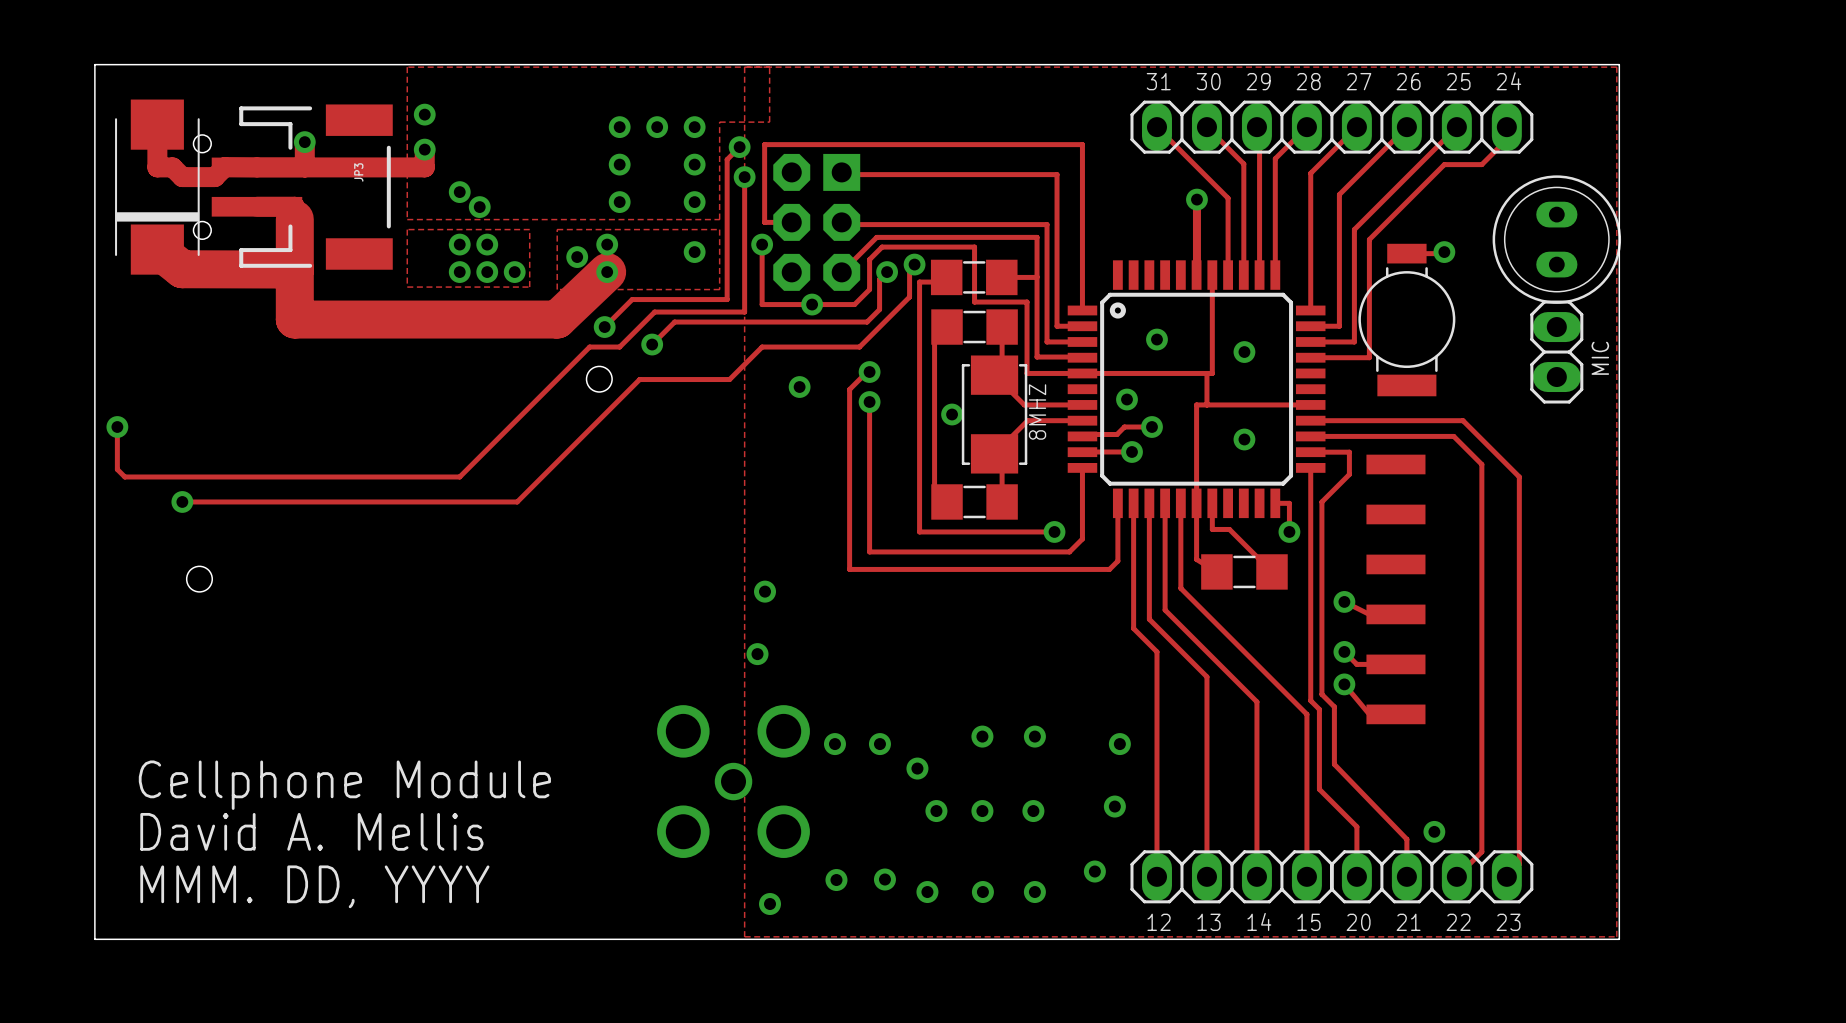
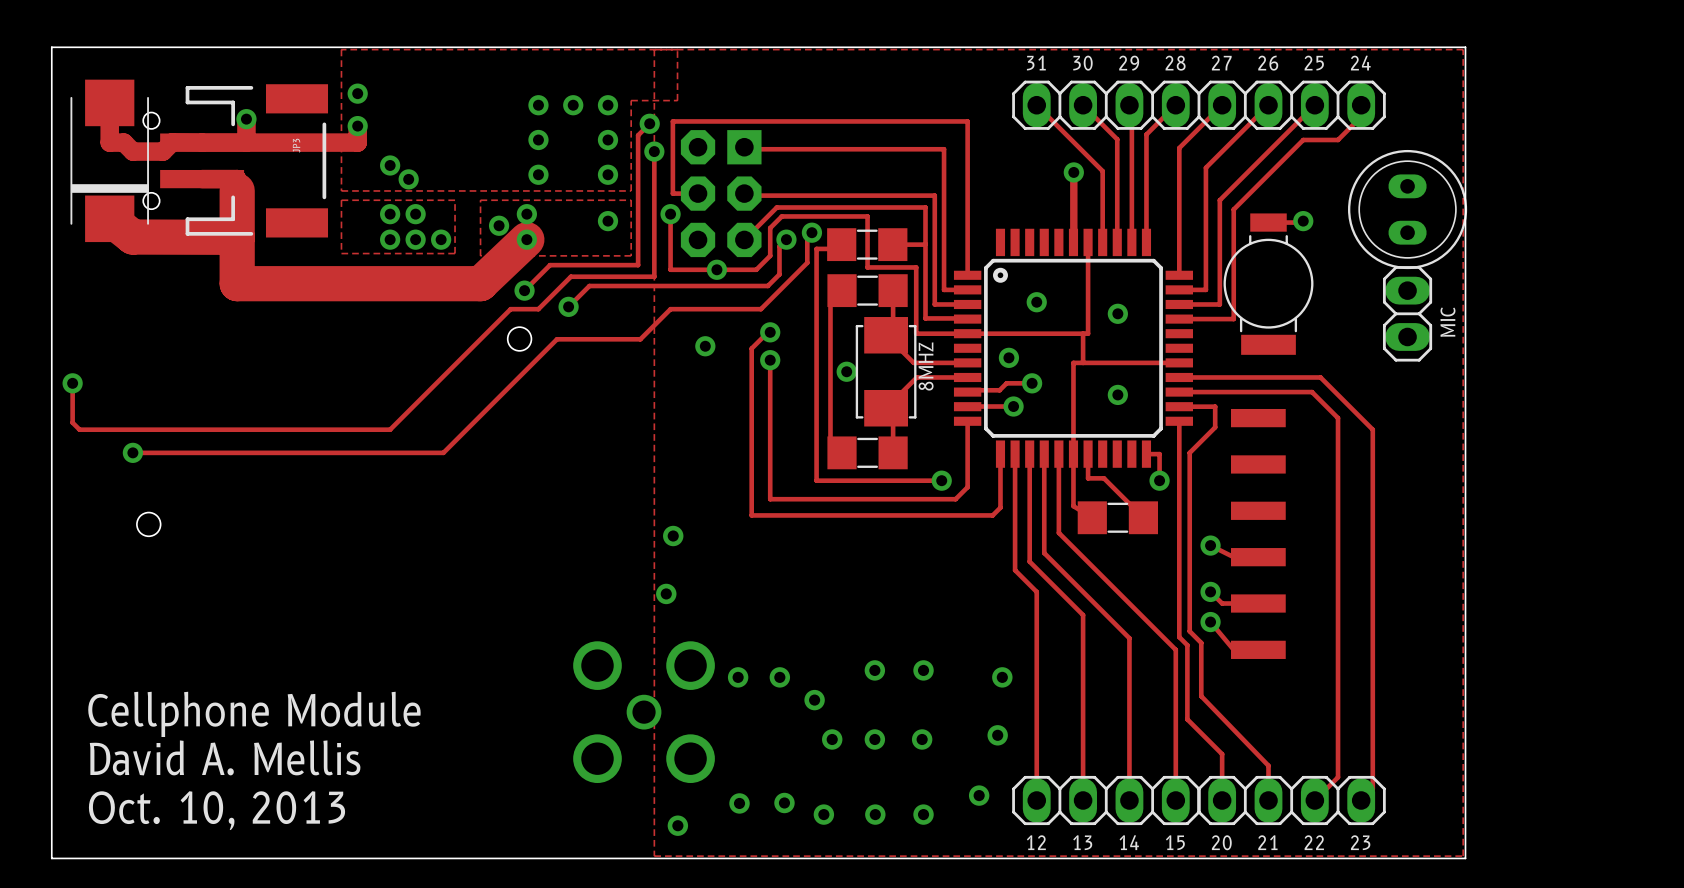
via: (1434, 831) -> none
text: MMM. DD, YYYY (314, 886) -> Oct. 10, 2013 (217, 810)

